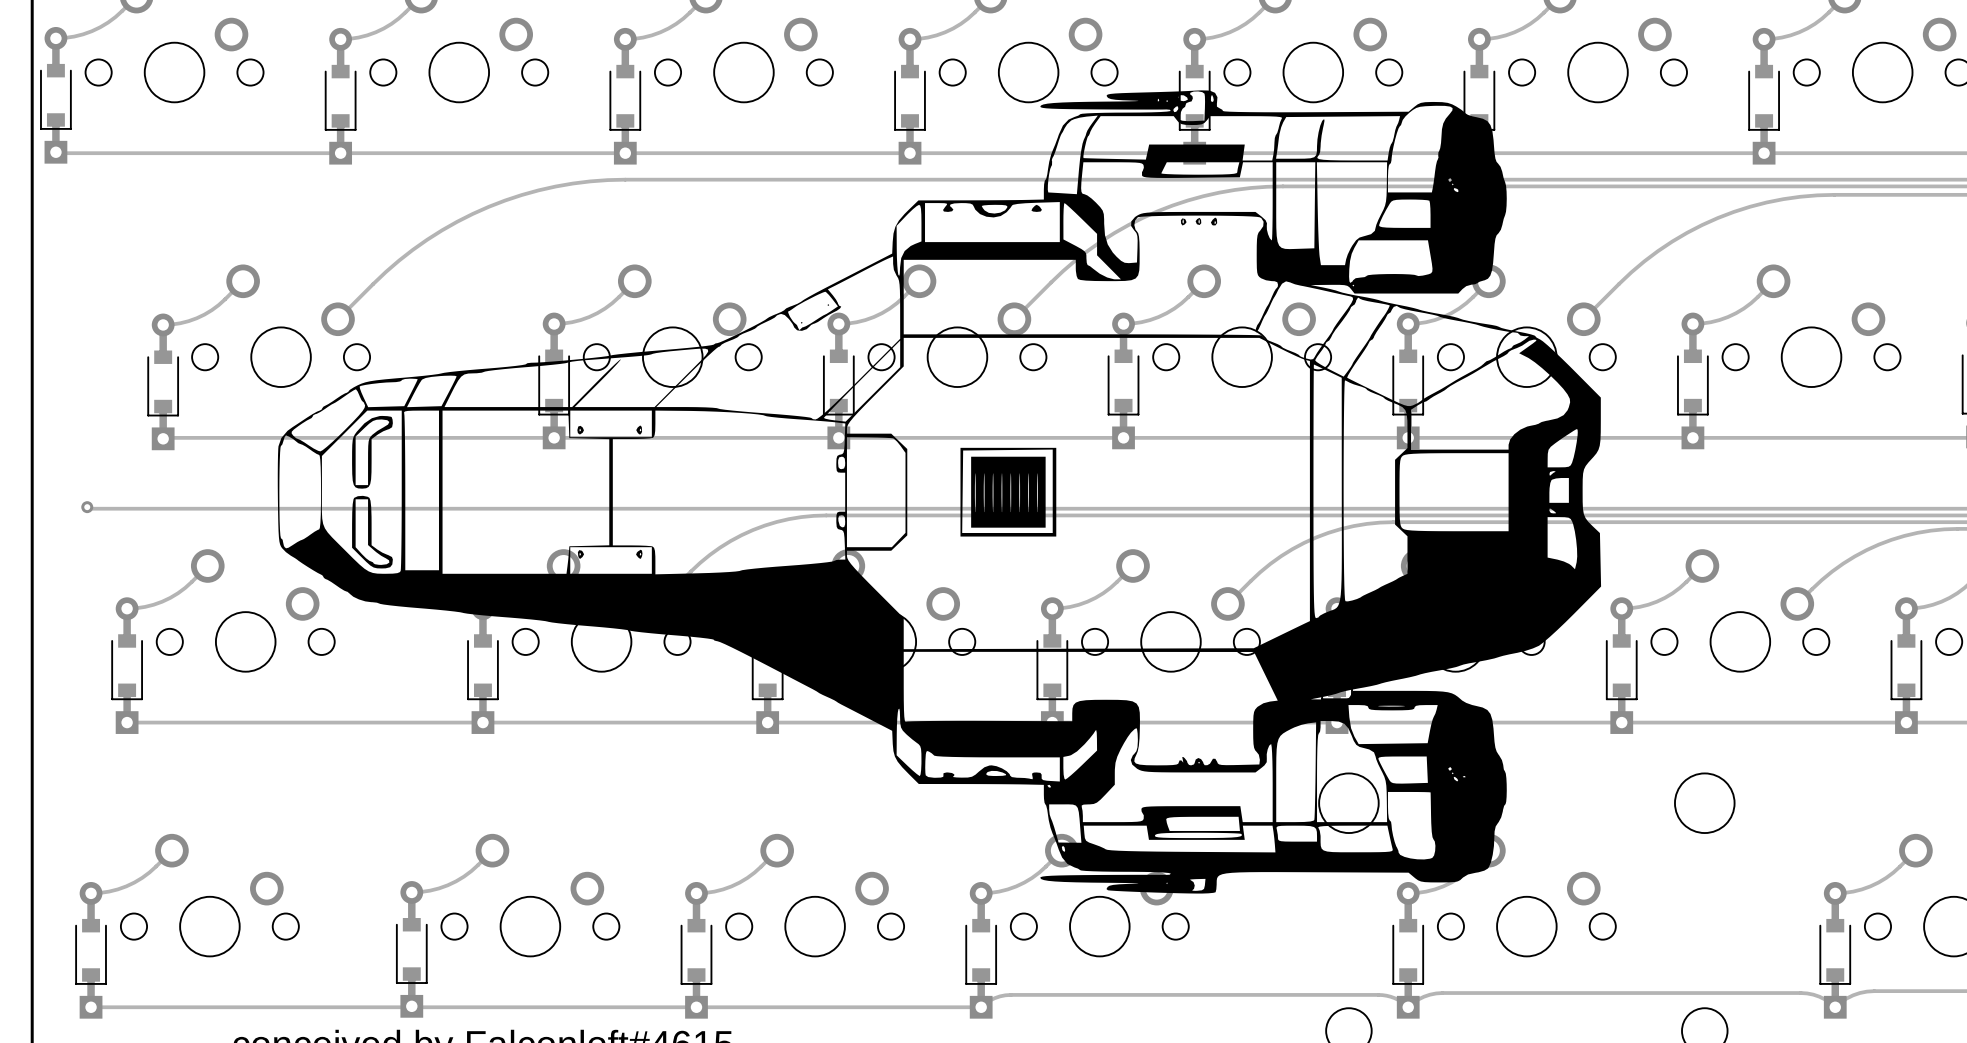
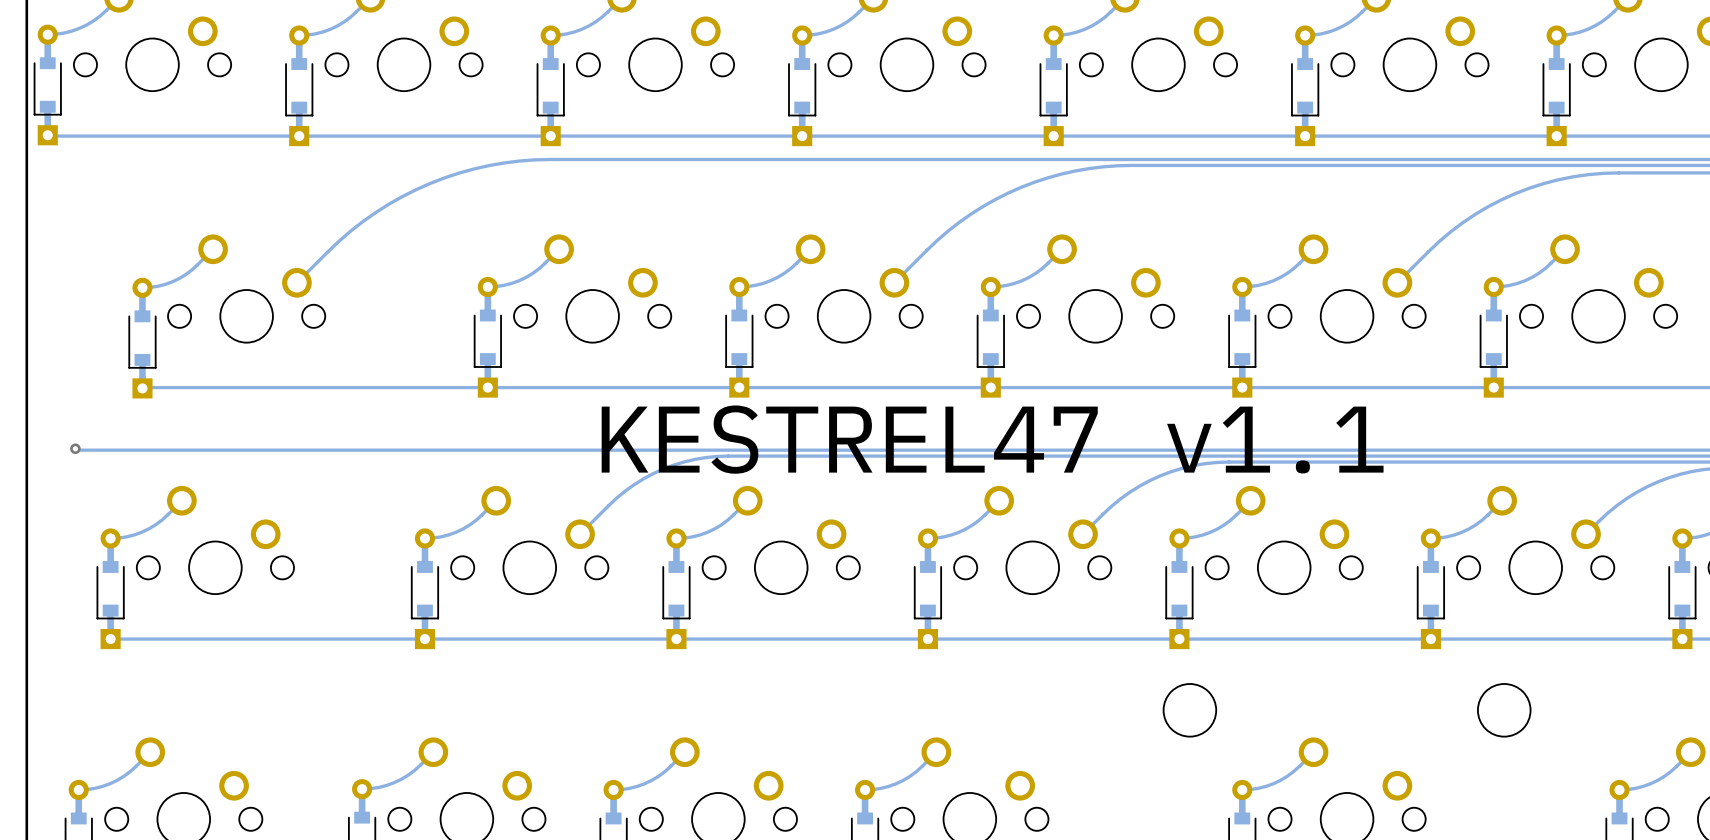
drawing: [277, 90, 1602, 894] -> none
text: none -> KESTREL47 v1.1 (992, 439)

